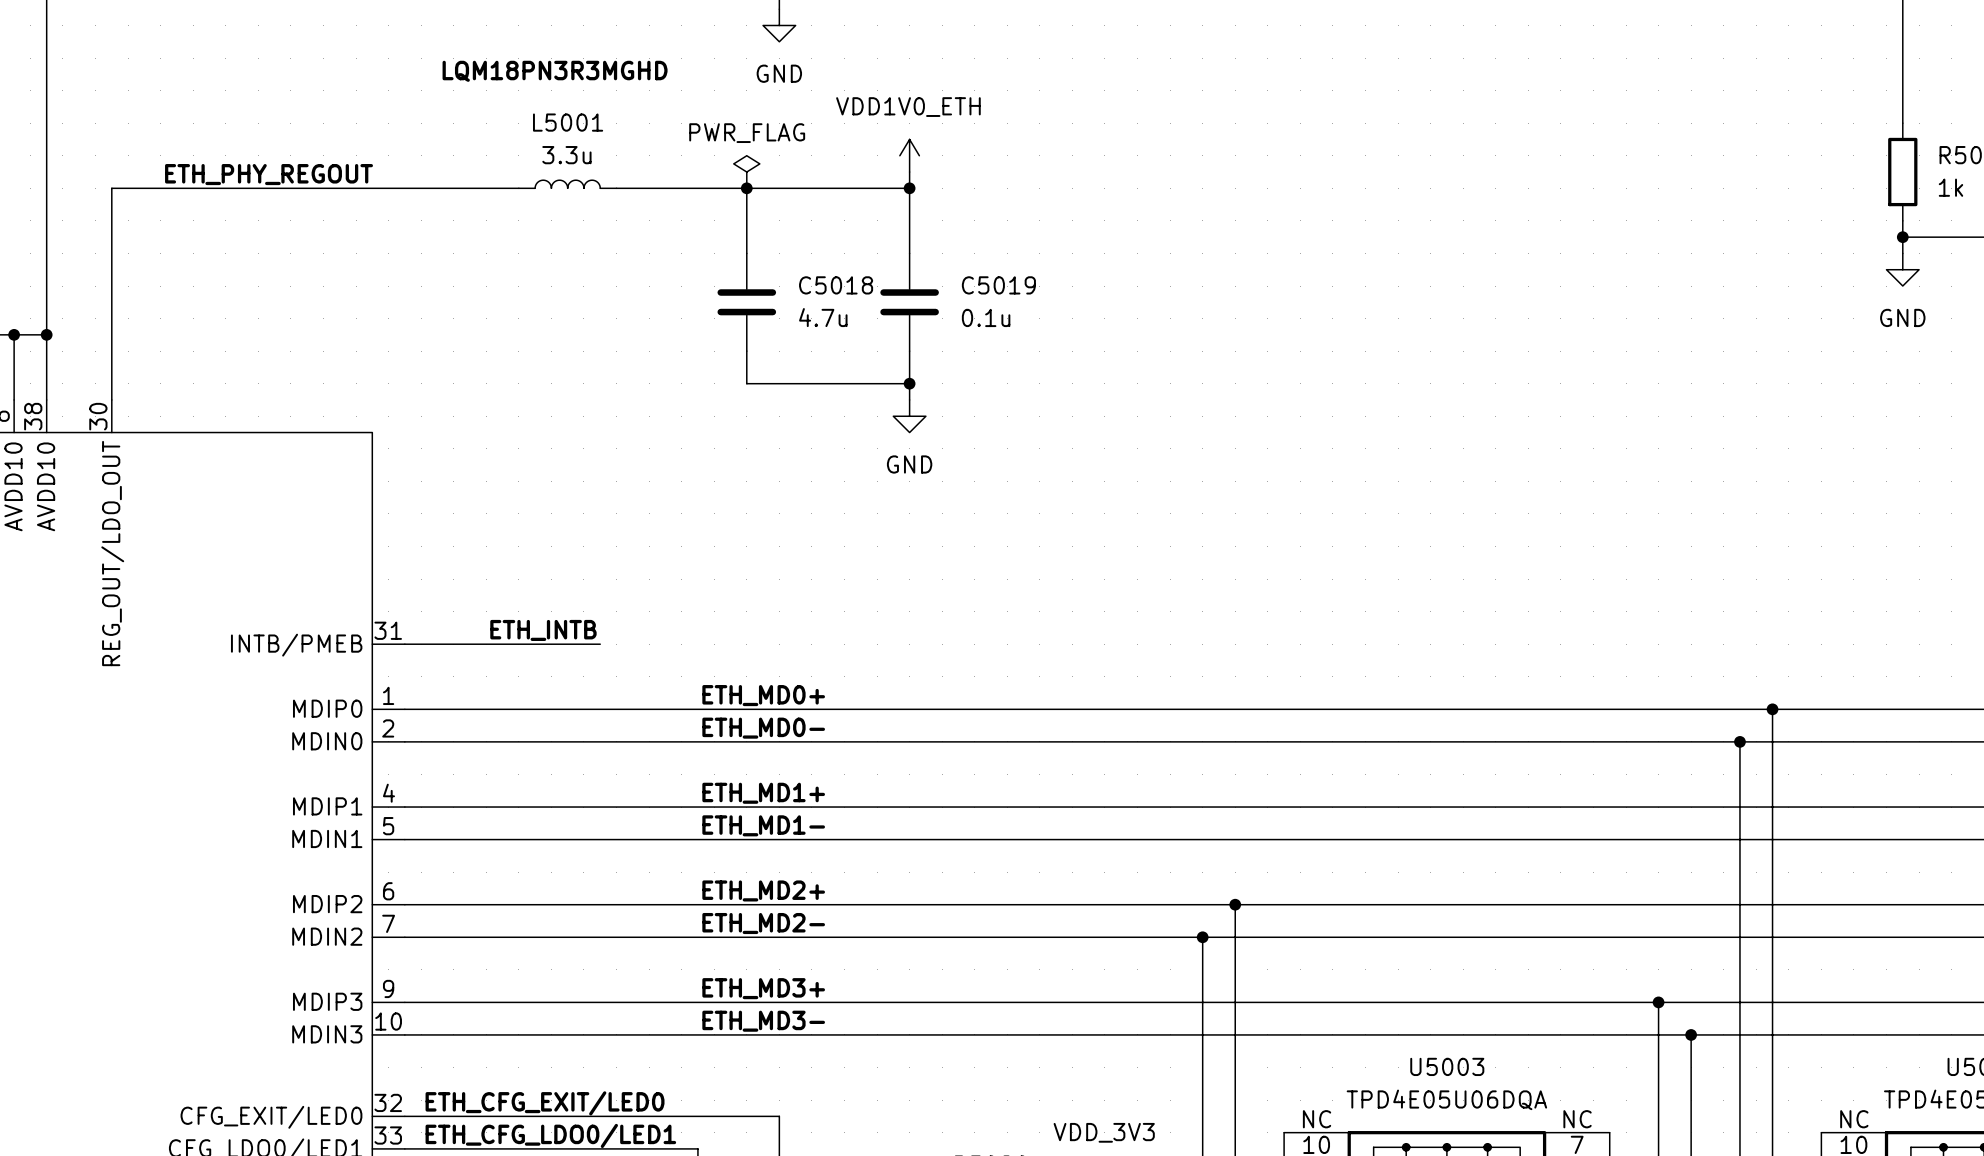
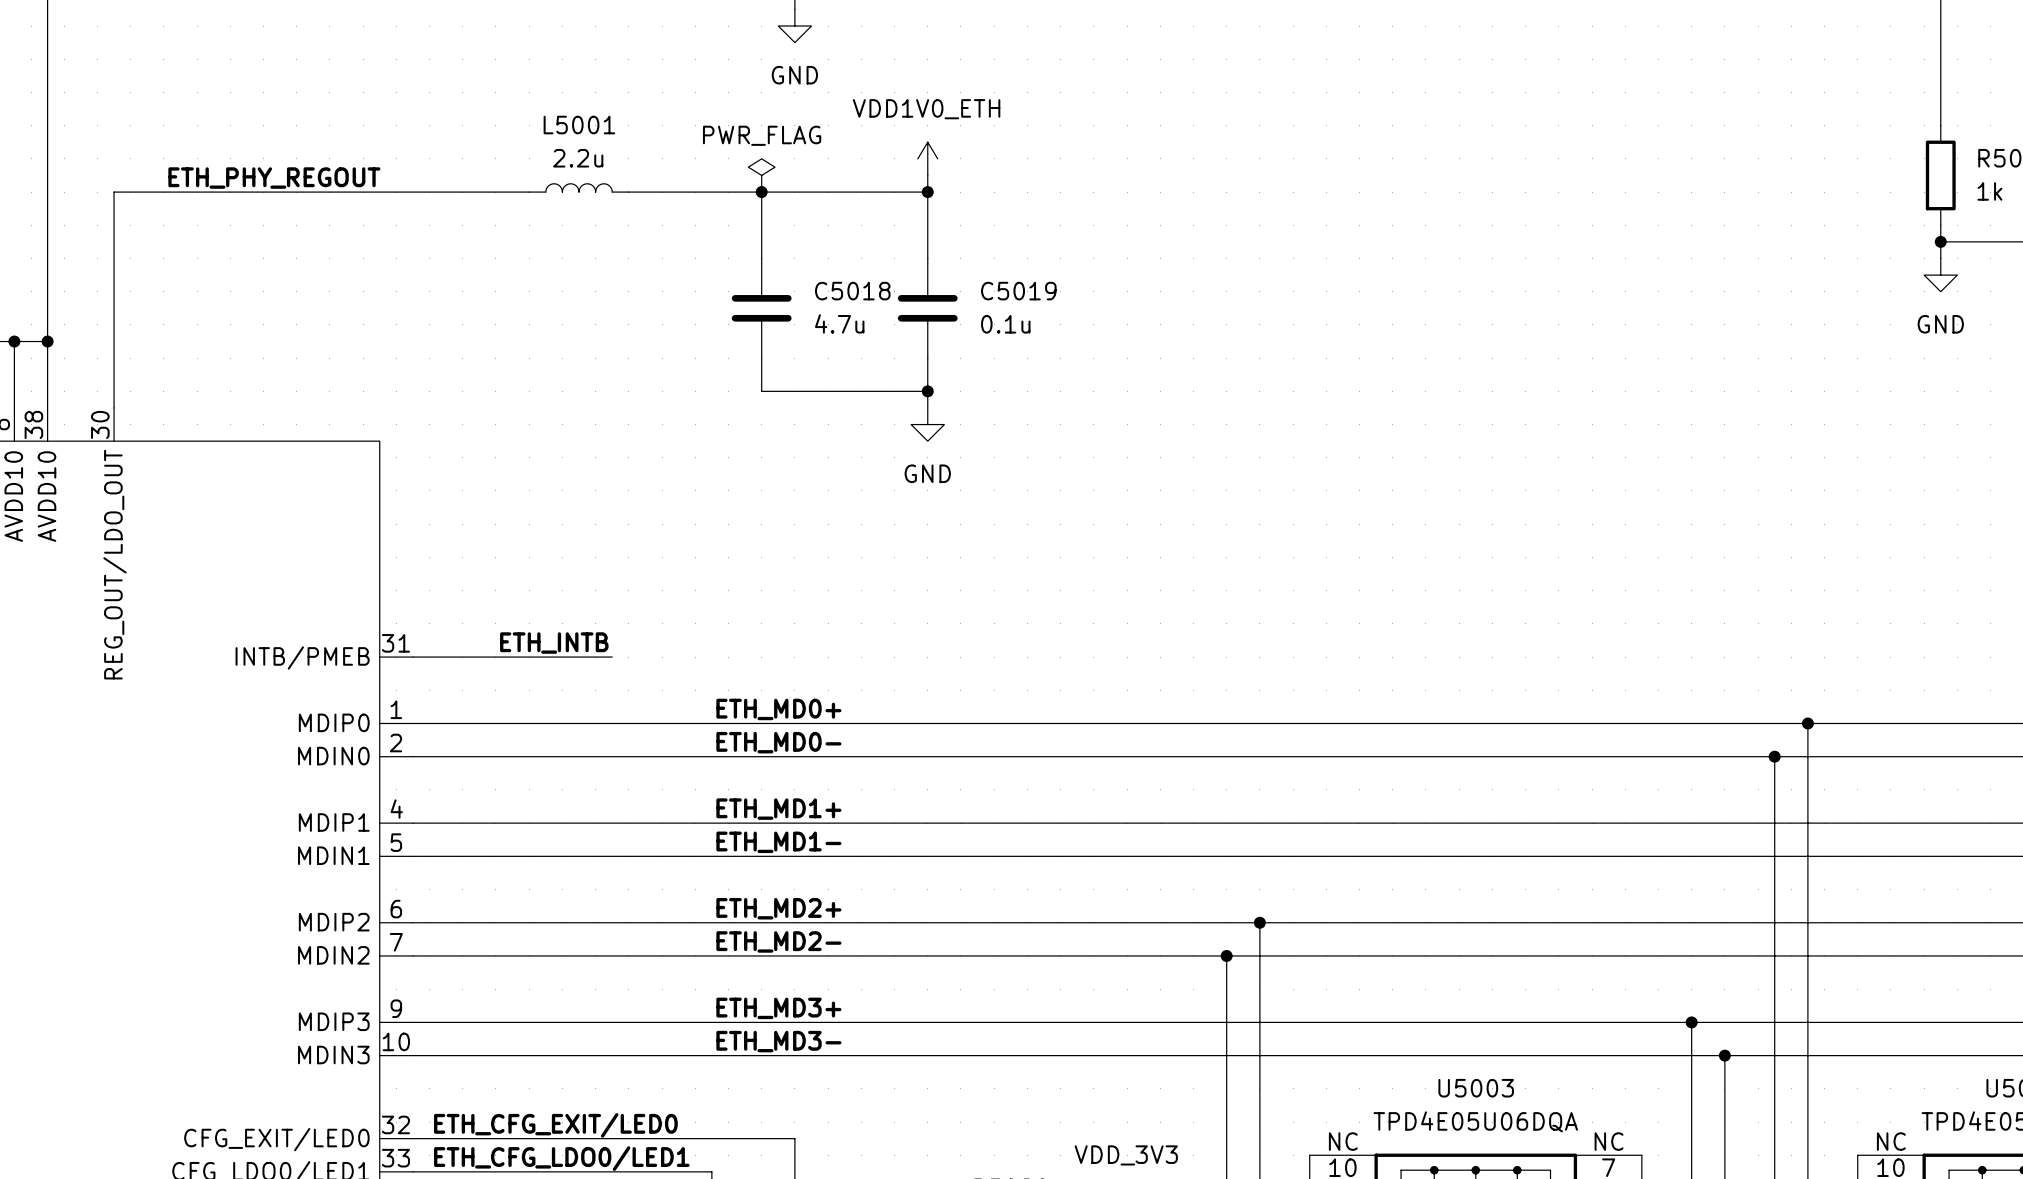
text: LQM18PN3R3MGHD (555, 71) -> none
L5001 value: 3.3u (566, 155) -> 2.2u (578, 158)

